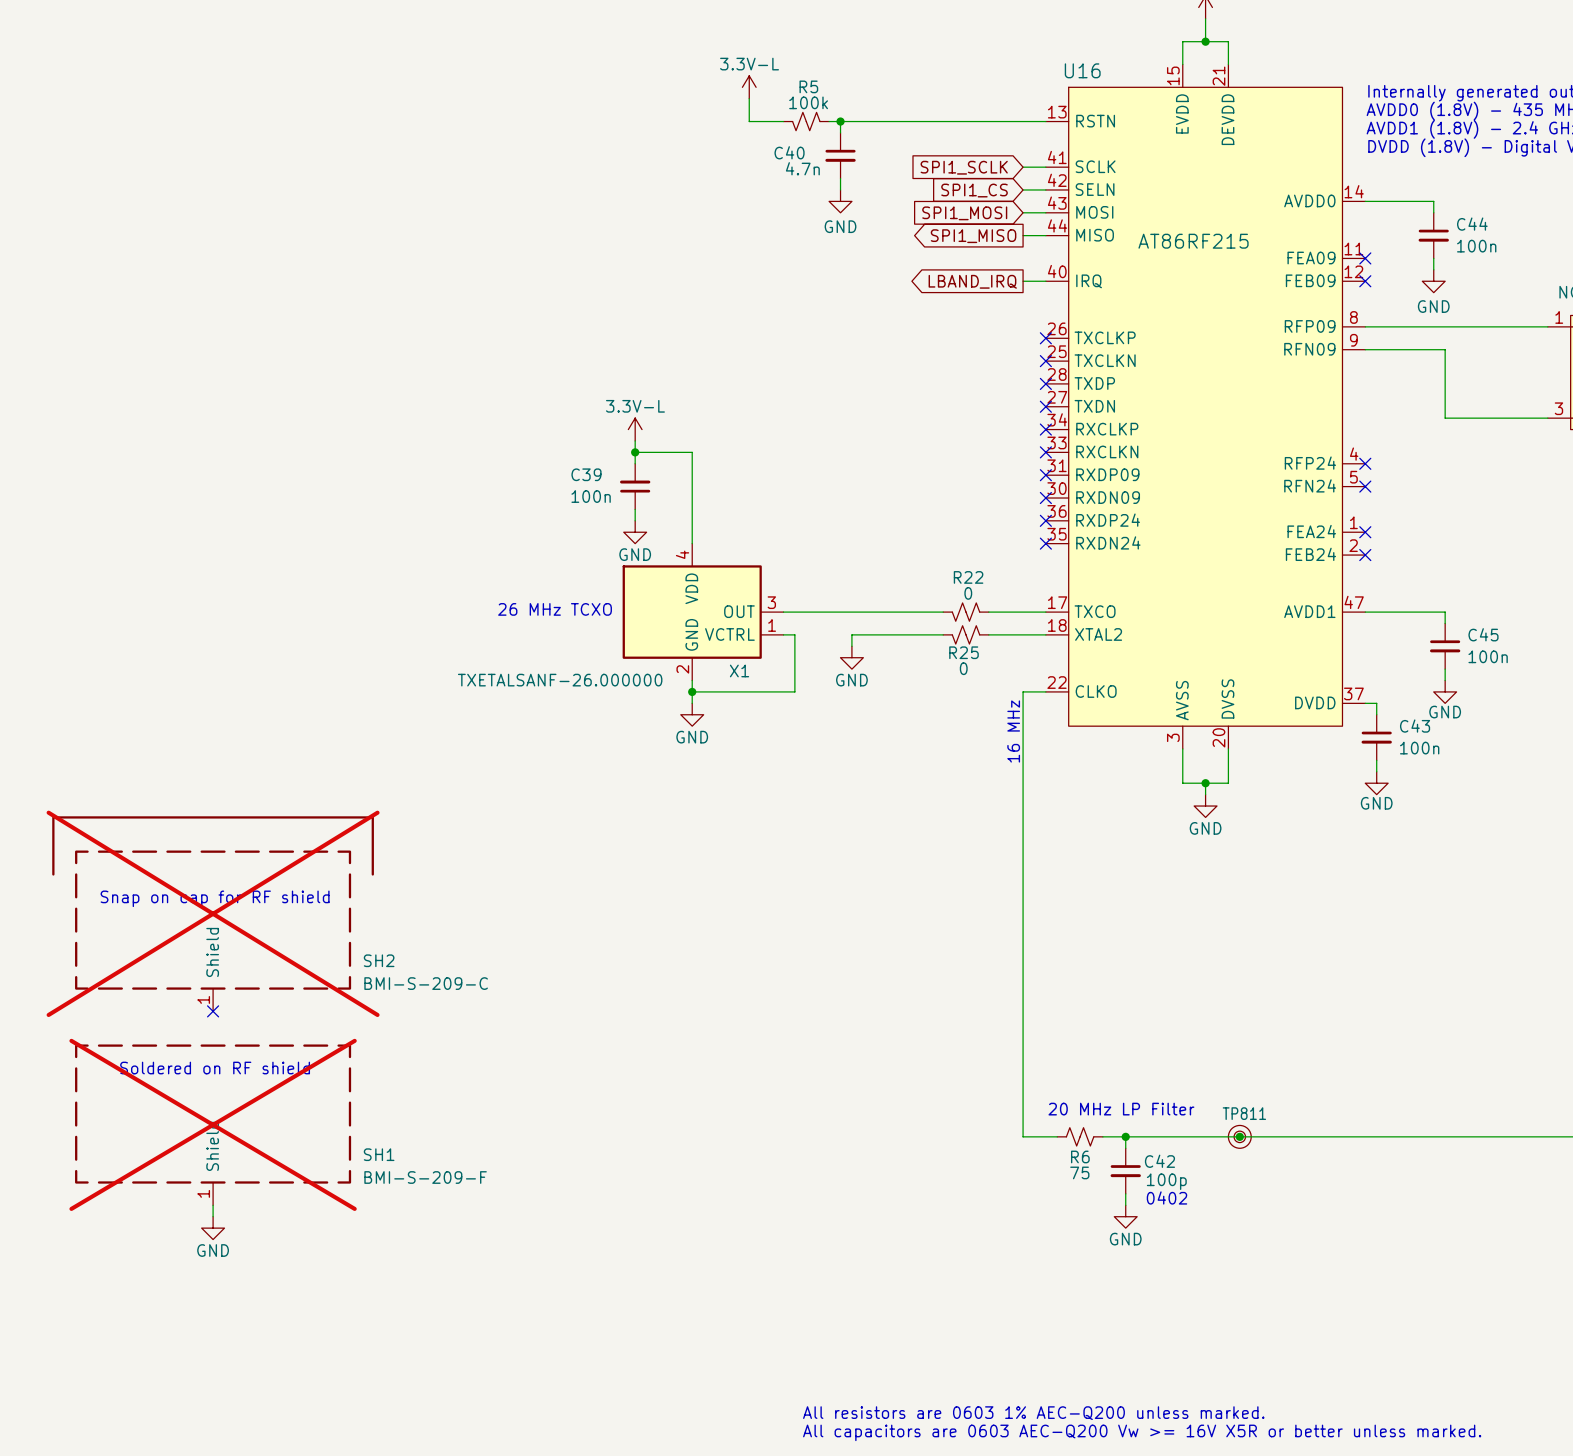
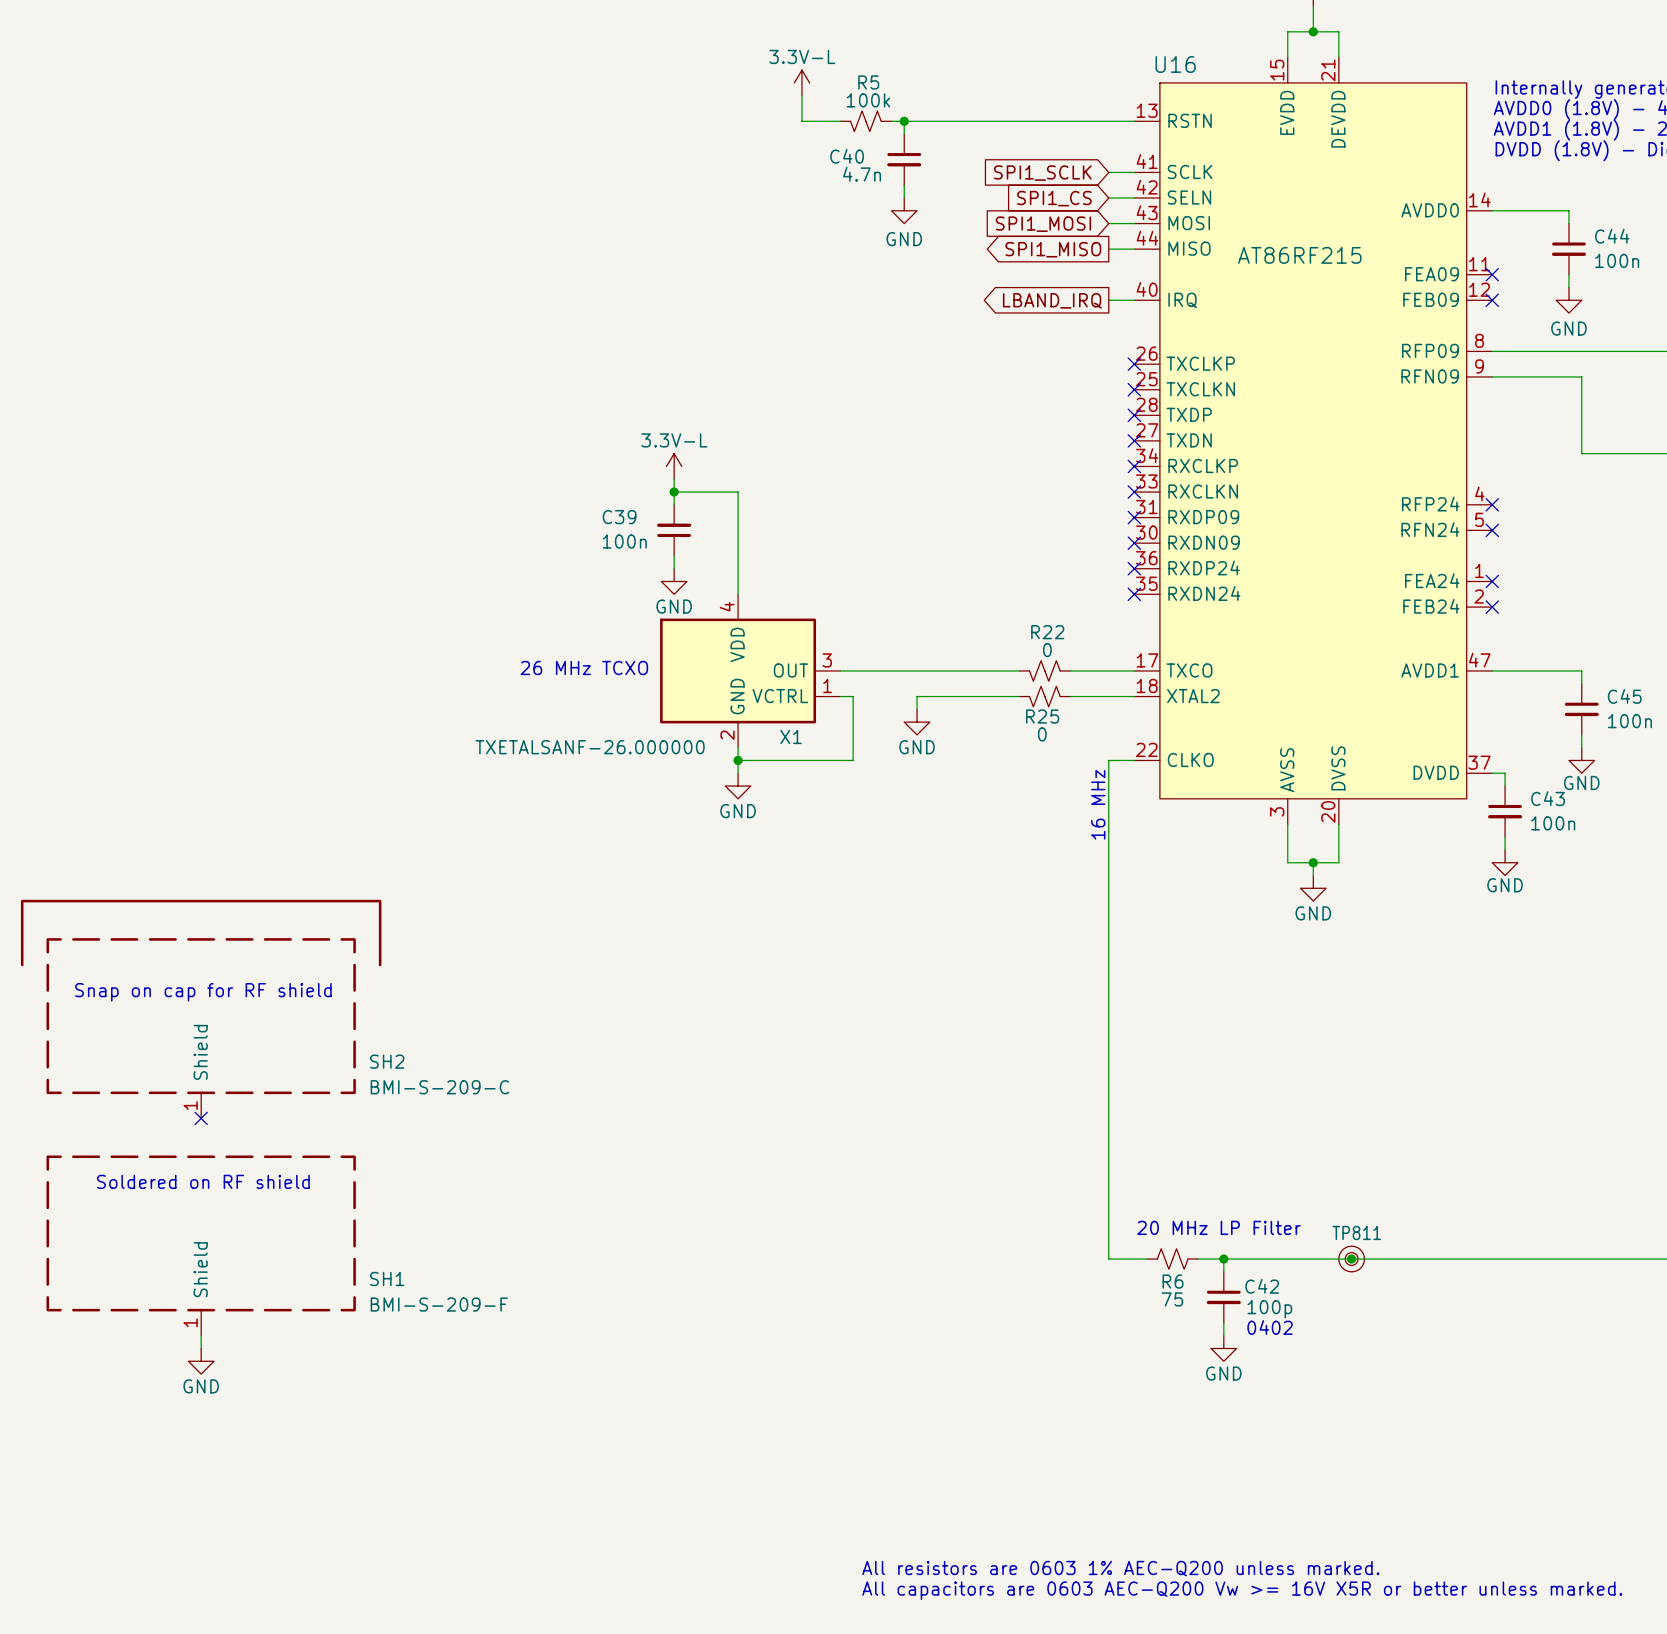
SH2 do-not-place cross: (213, 913) -> none
SH1 do-not-place cross: (213, 1124) -> none

